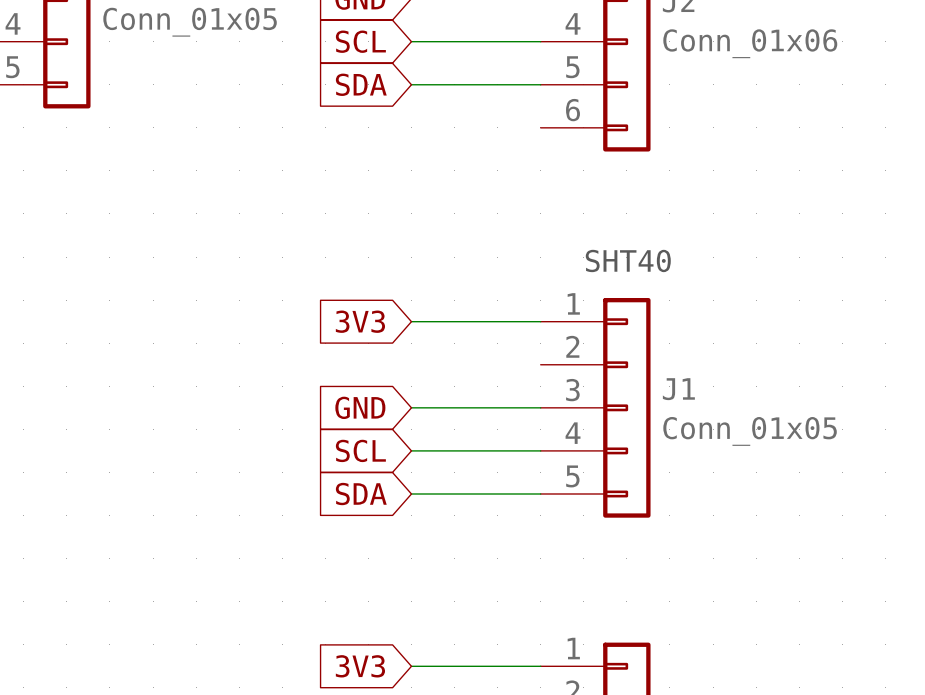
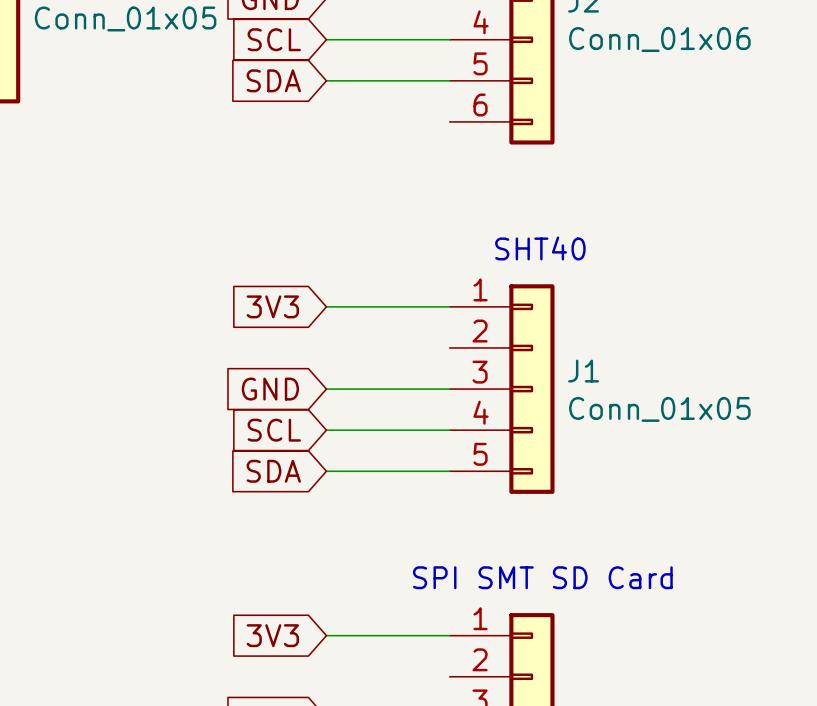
text: none -> SPI SMT SD Card (542, 577)

